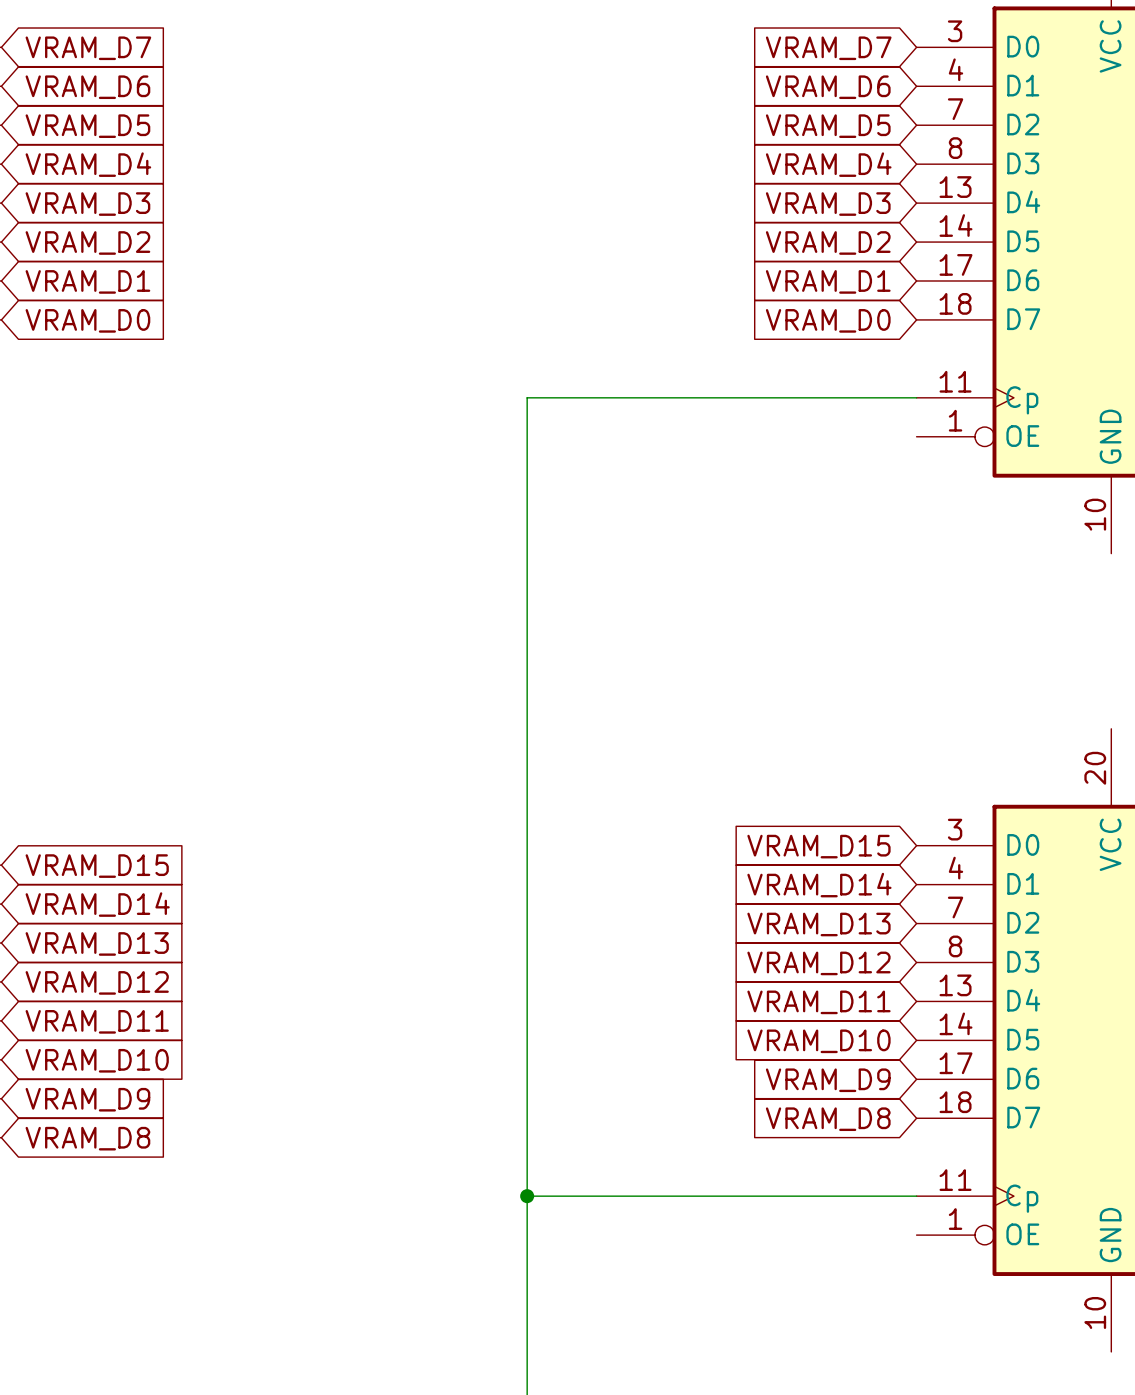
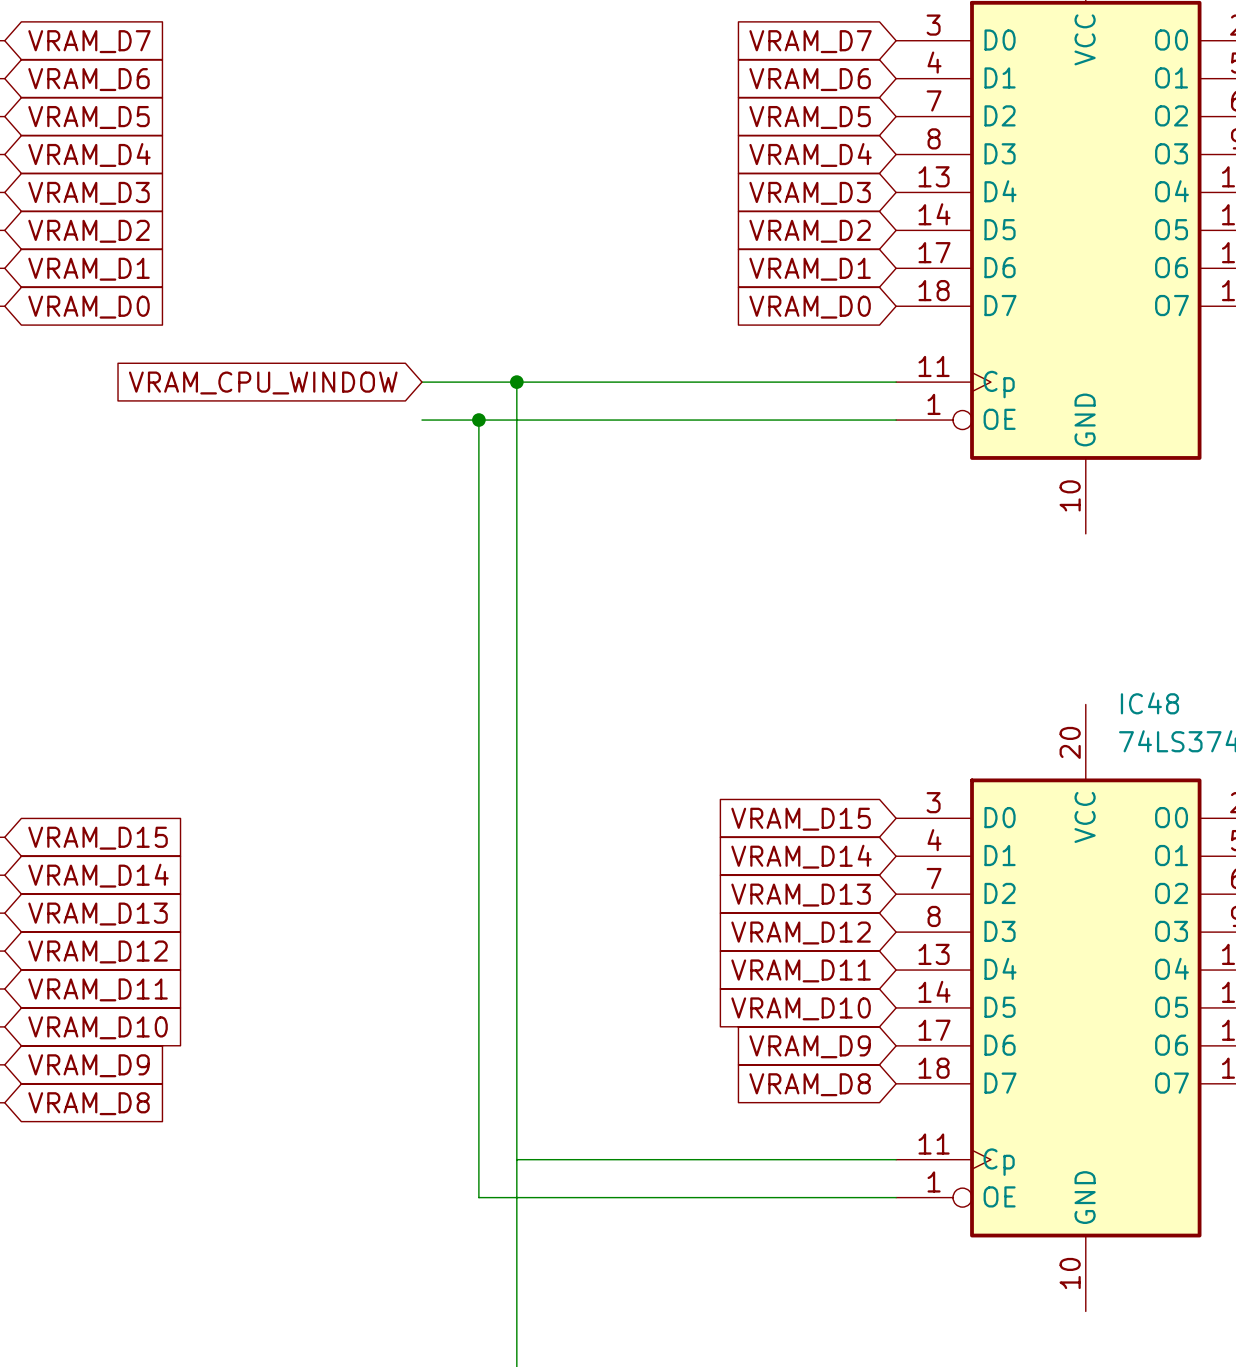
wire: none -> (422, 382) (516, 382)
junction: none -> (516, 382)
global label: none -> VRAM_CPU_WINDOW (263, 383)
wire: none -> (422, 420) (896, 420)
wire: none -> (478, 420) (478, 1197) (896, 1197)
junction: none -> (478, 420)
junction: (527, 1196) -> none

